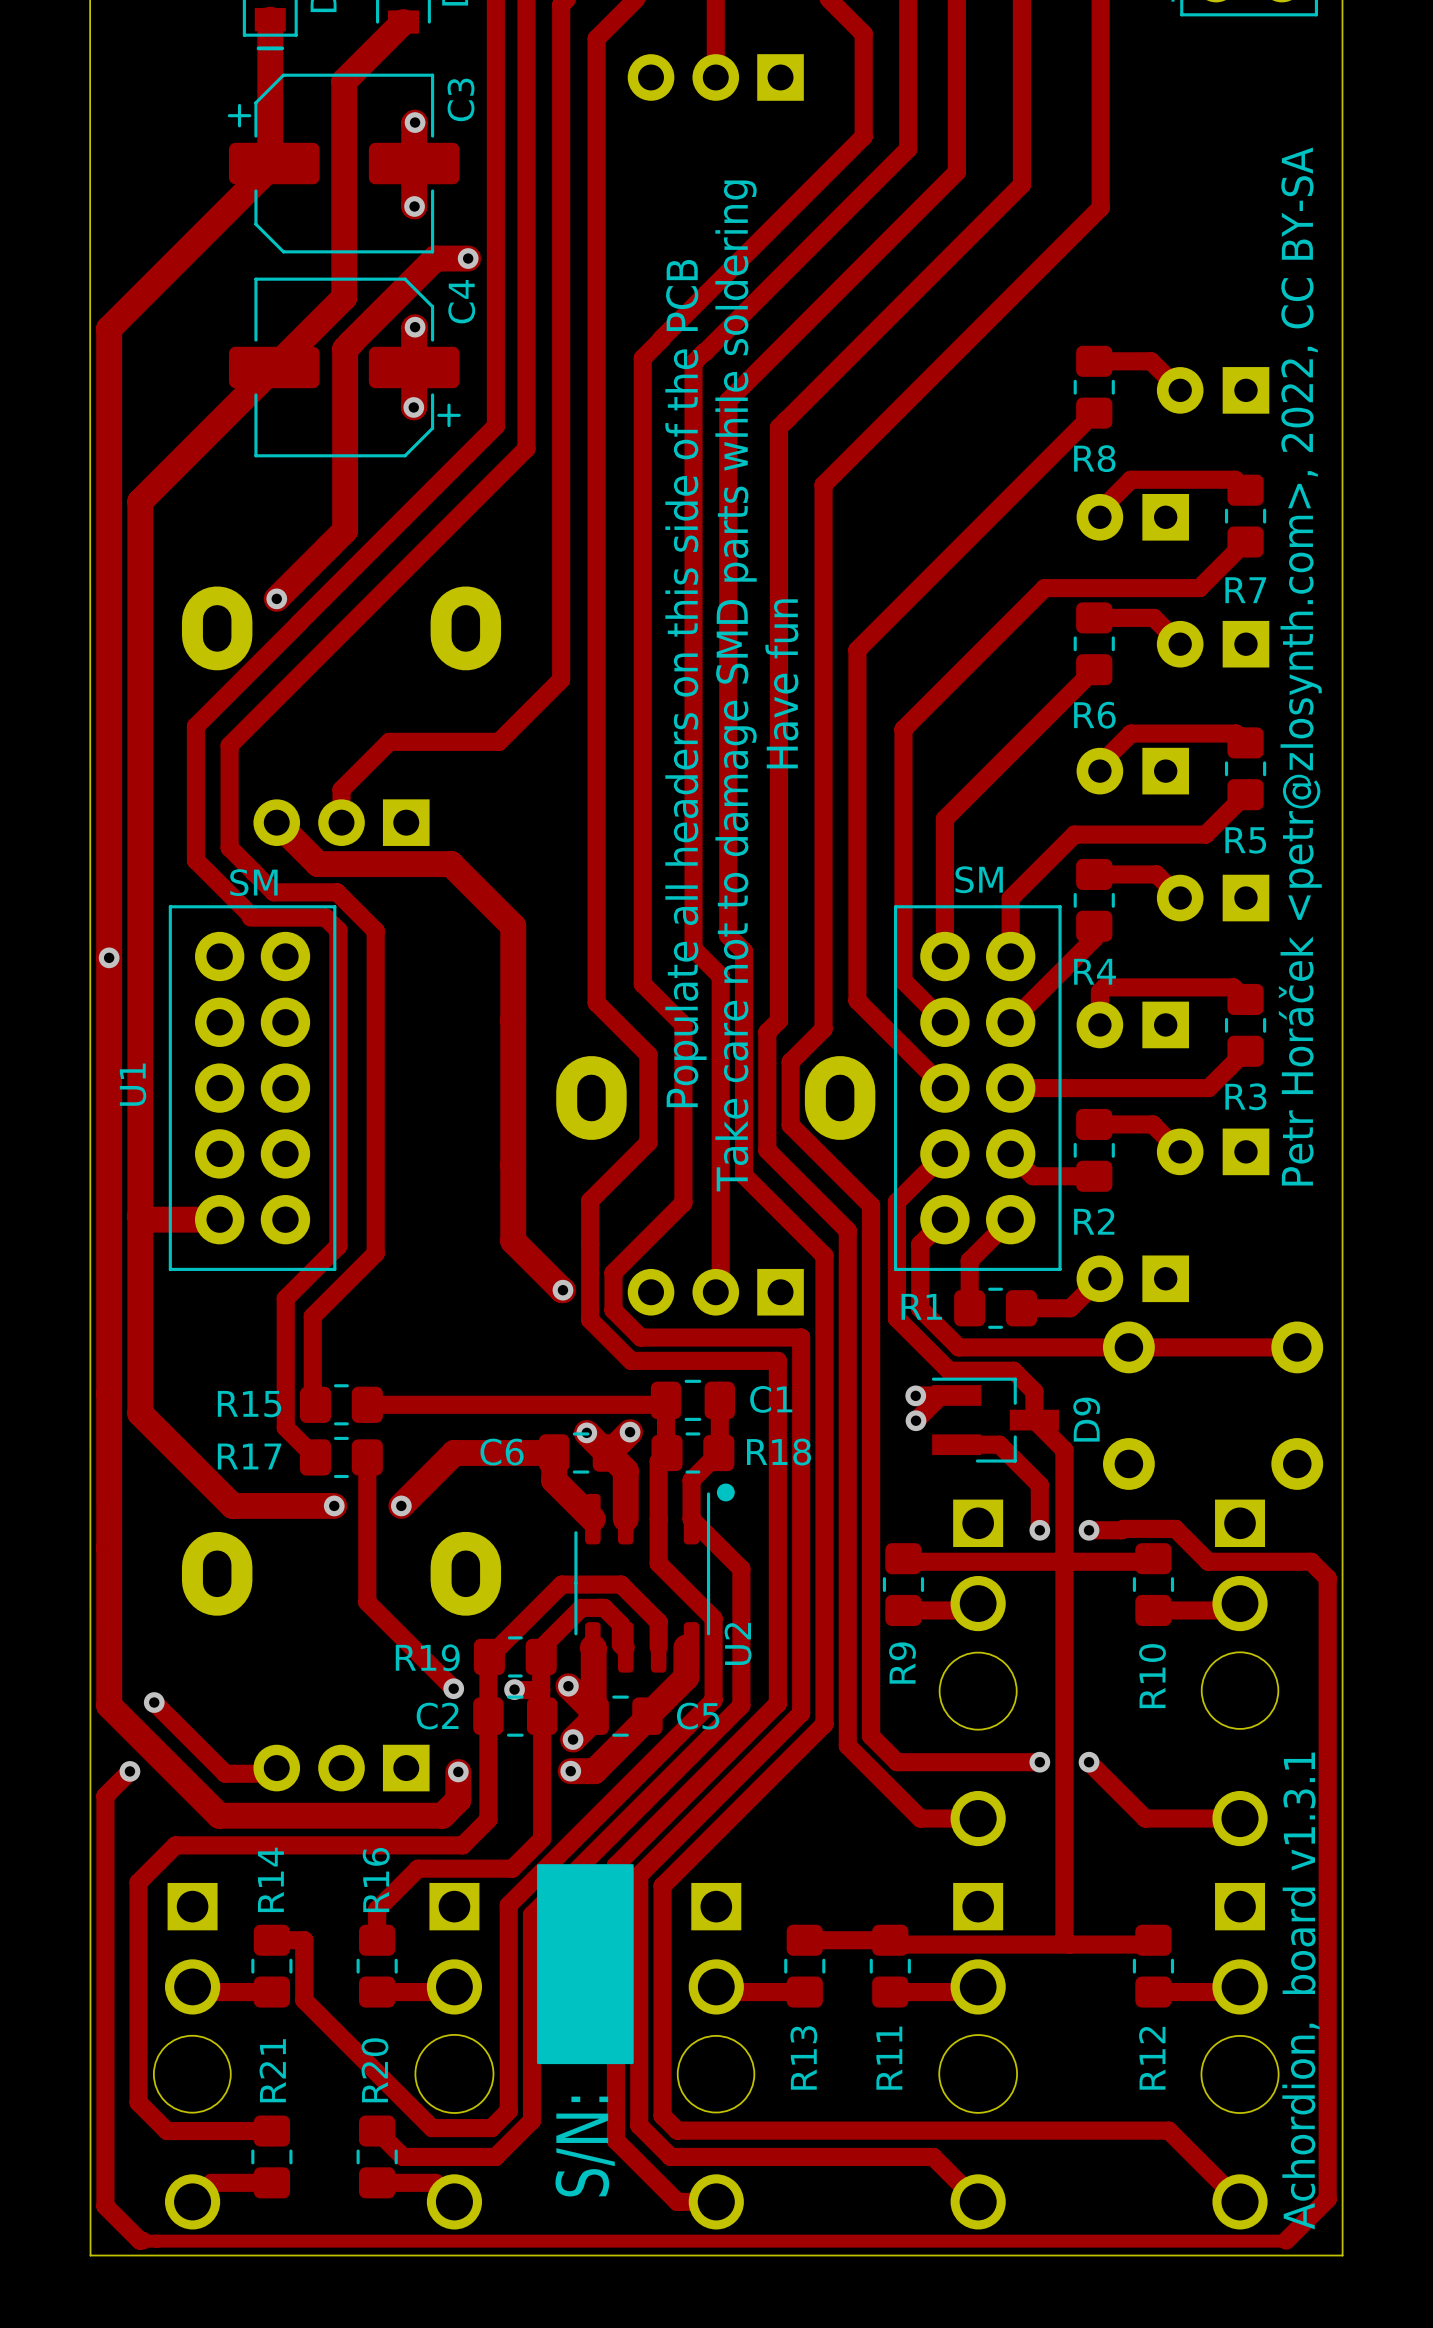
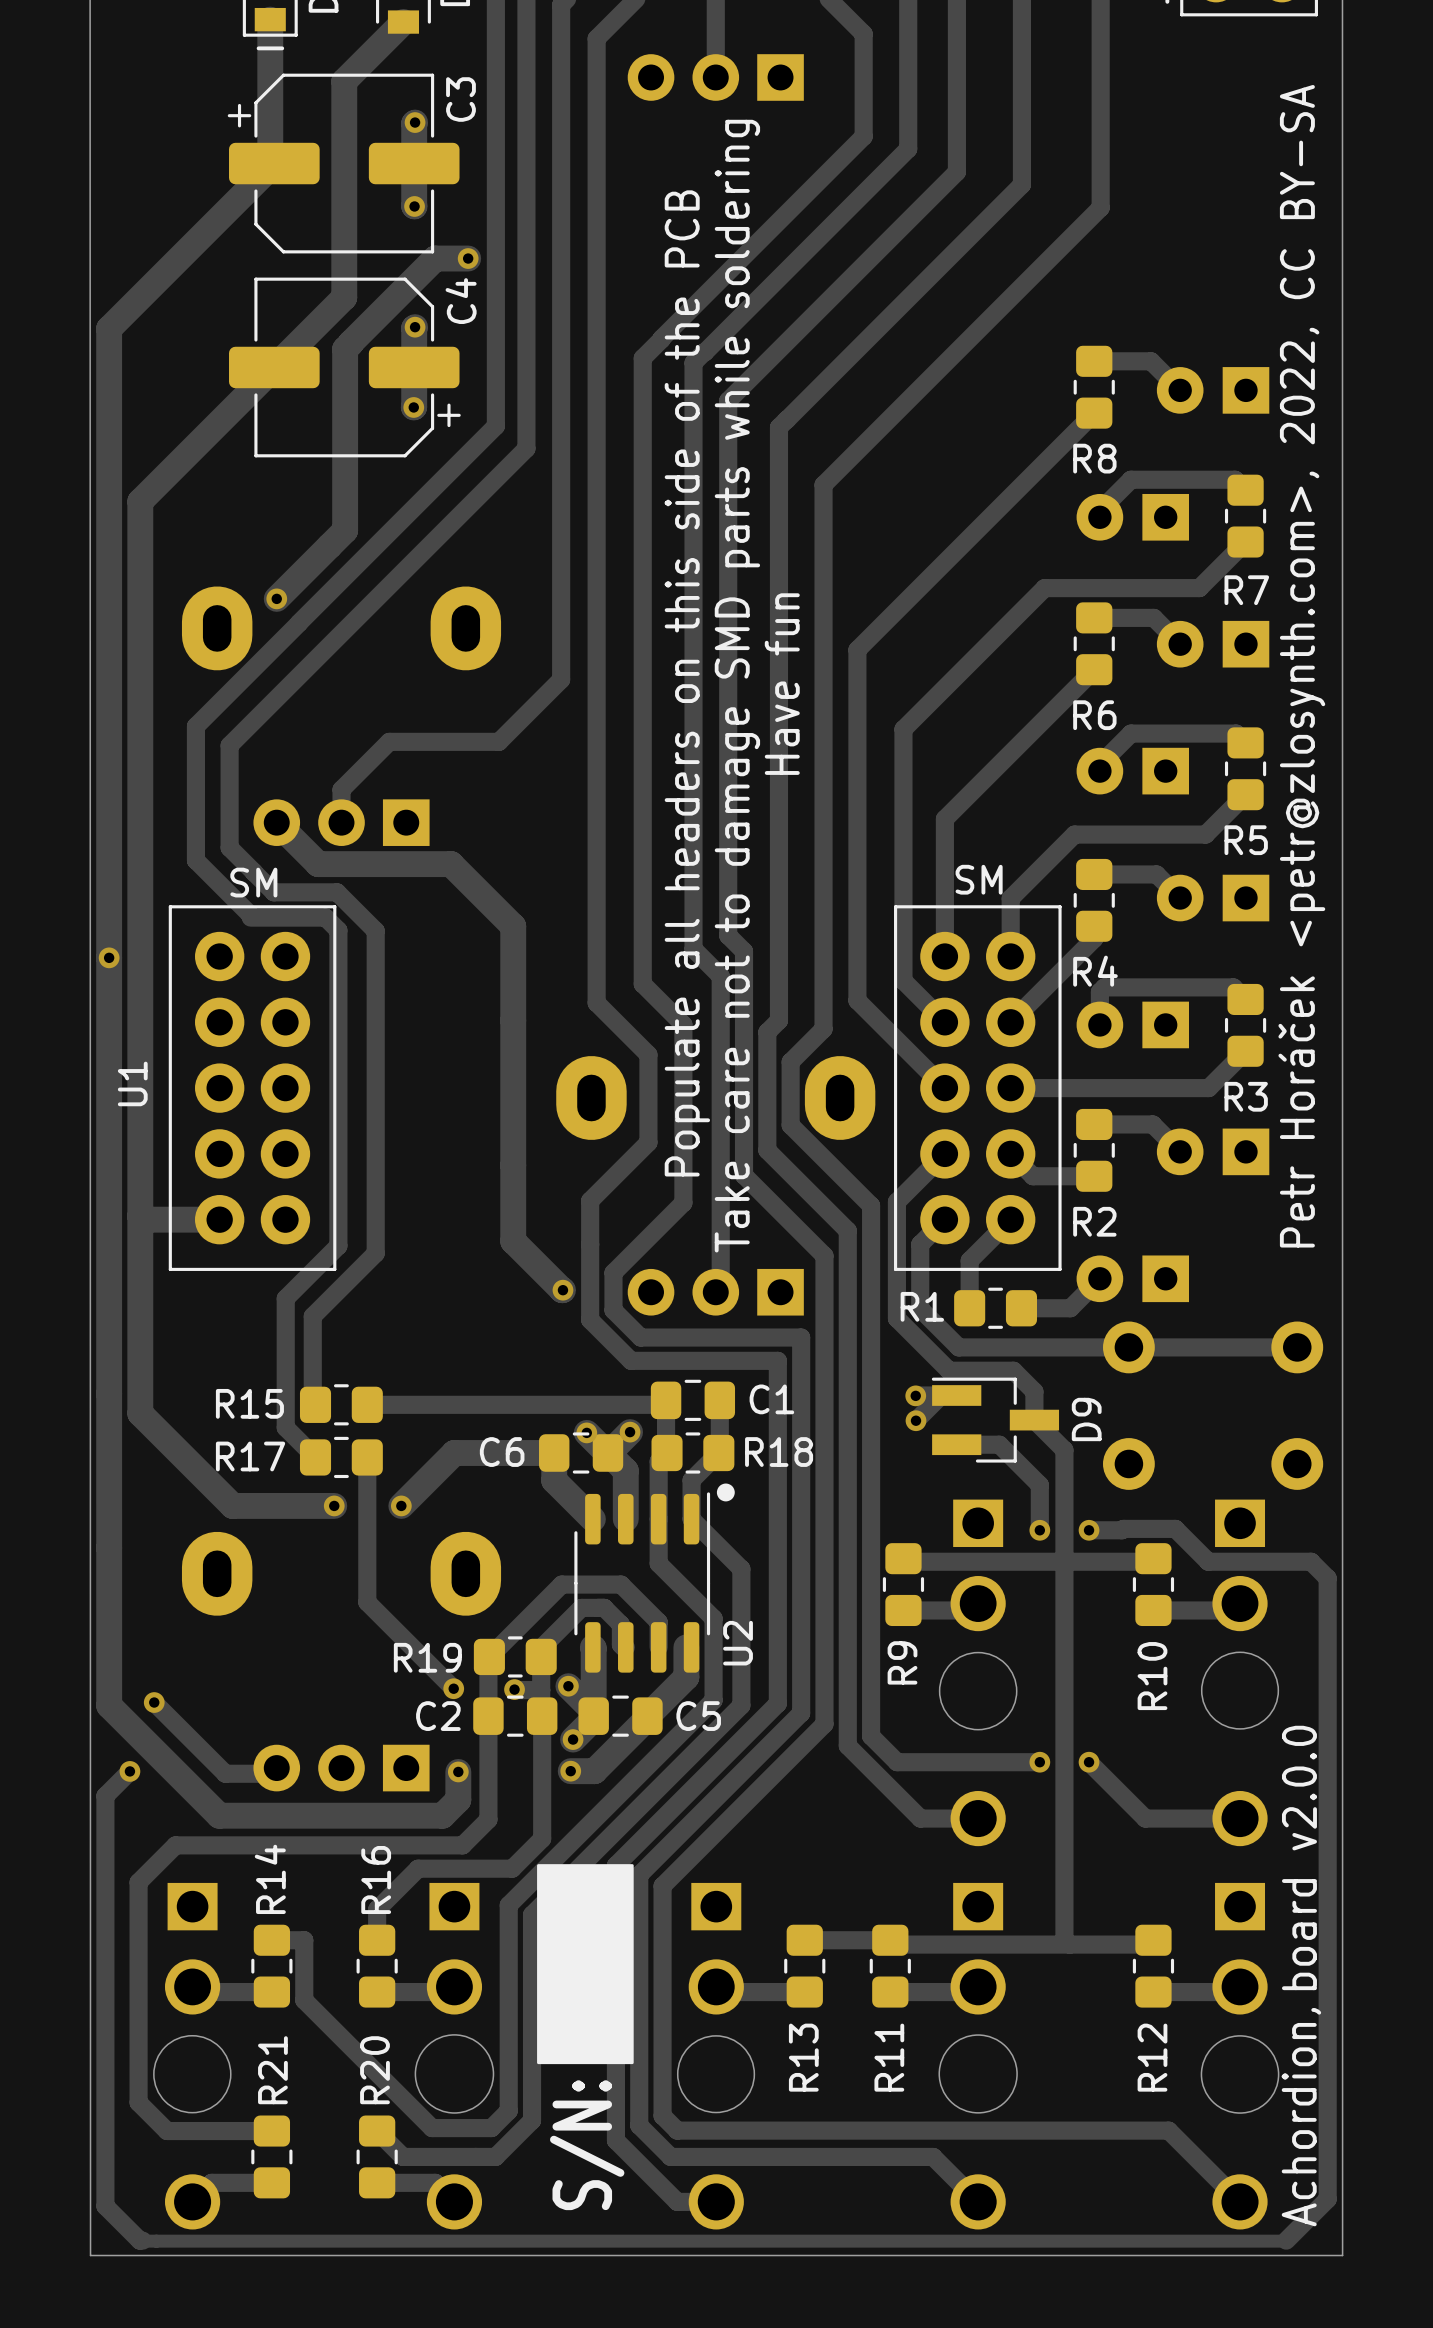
text: board v1.3.1 (1299, 1873) -> board v2.0.0 (1299, 1857)

